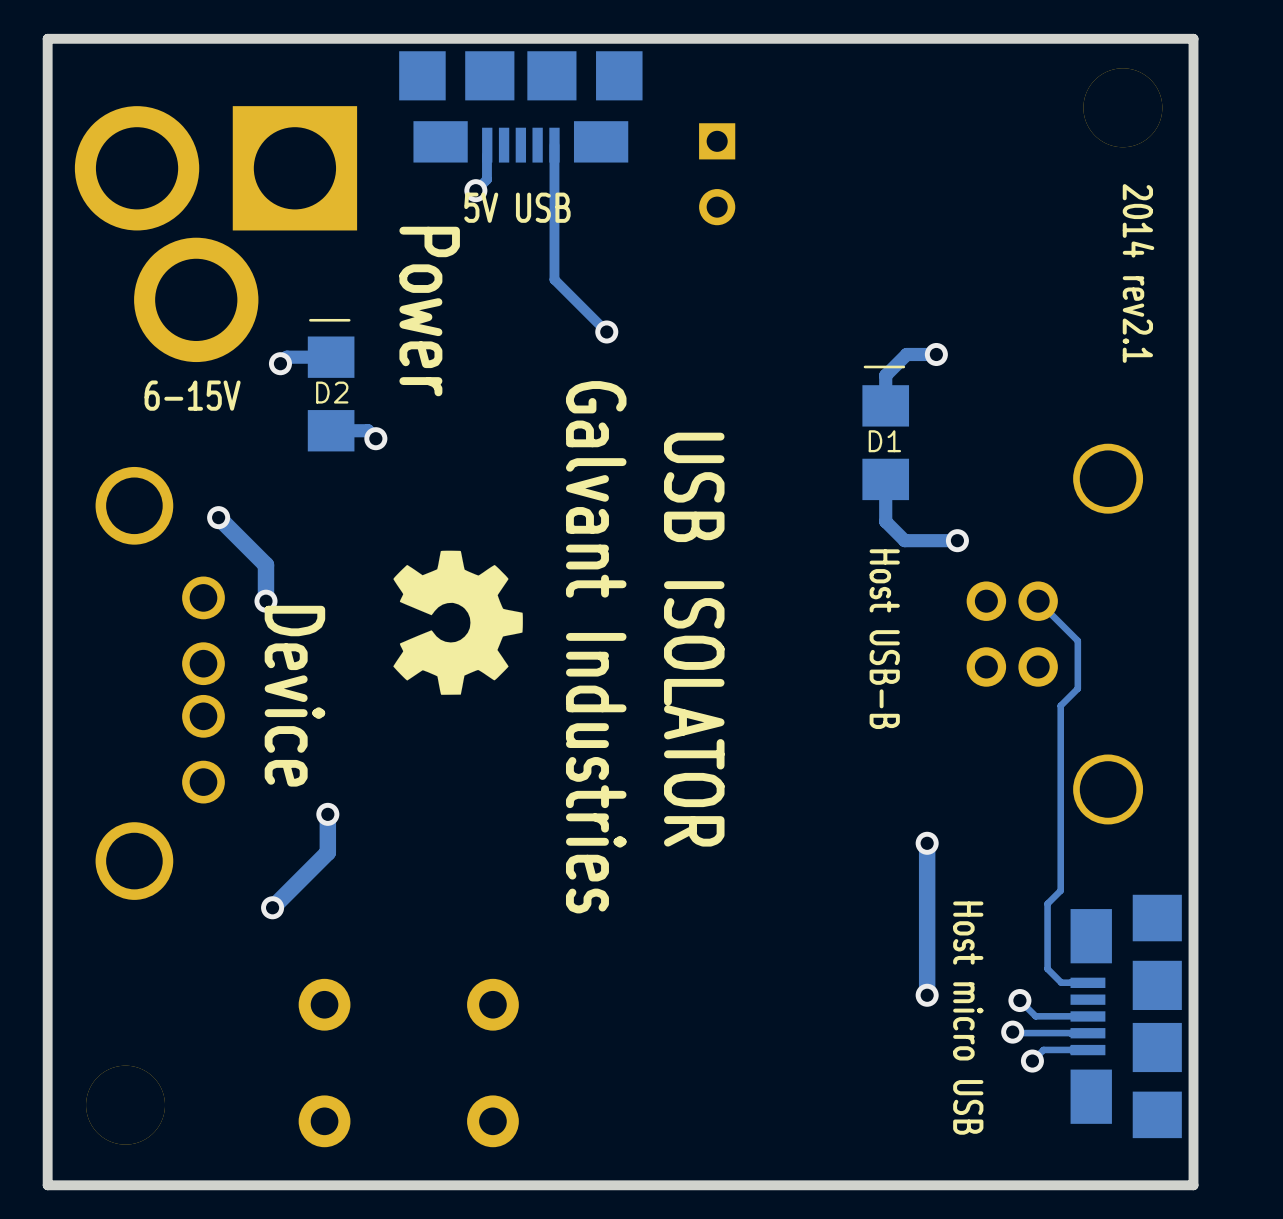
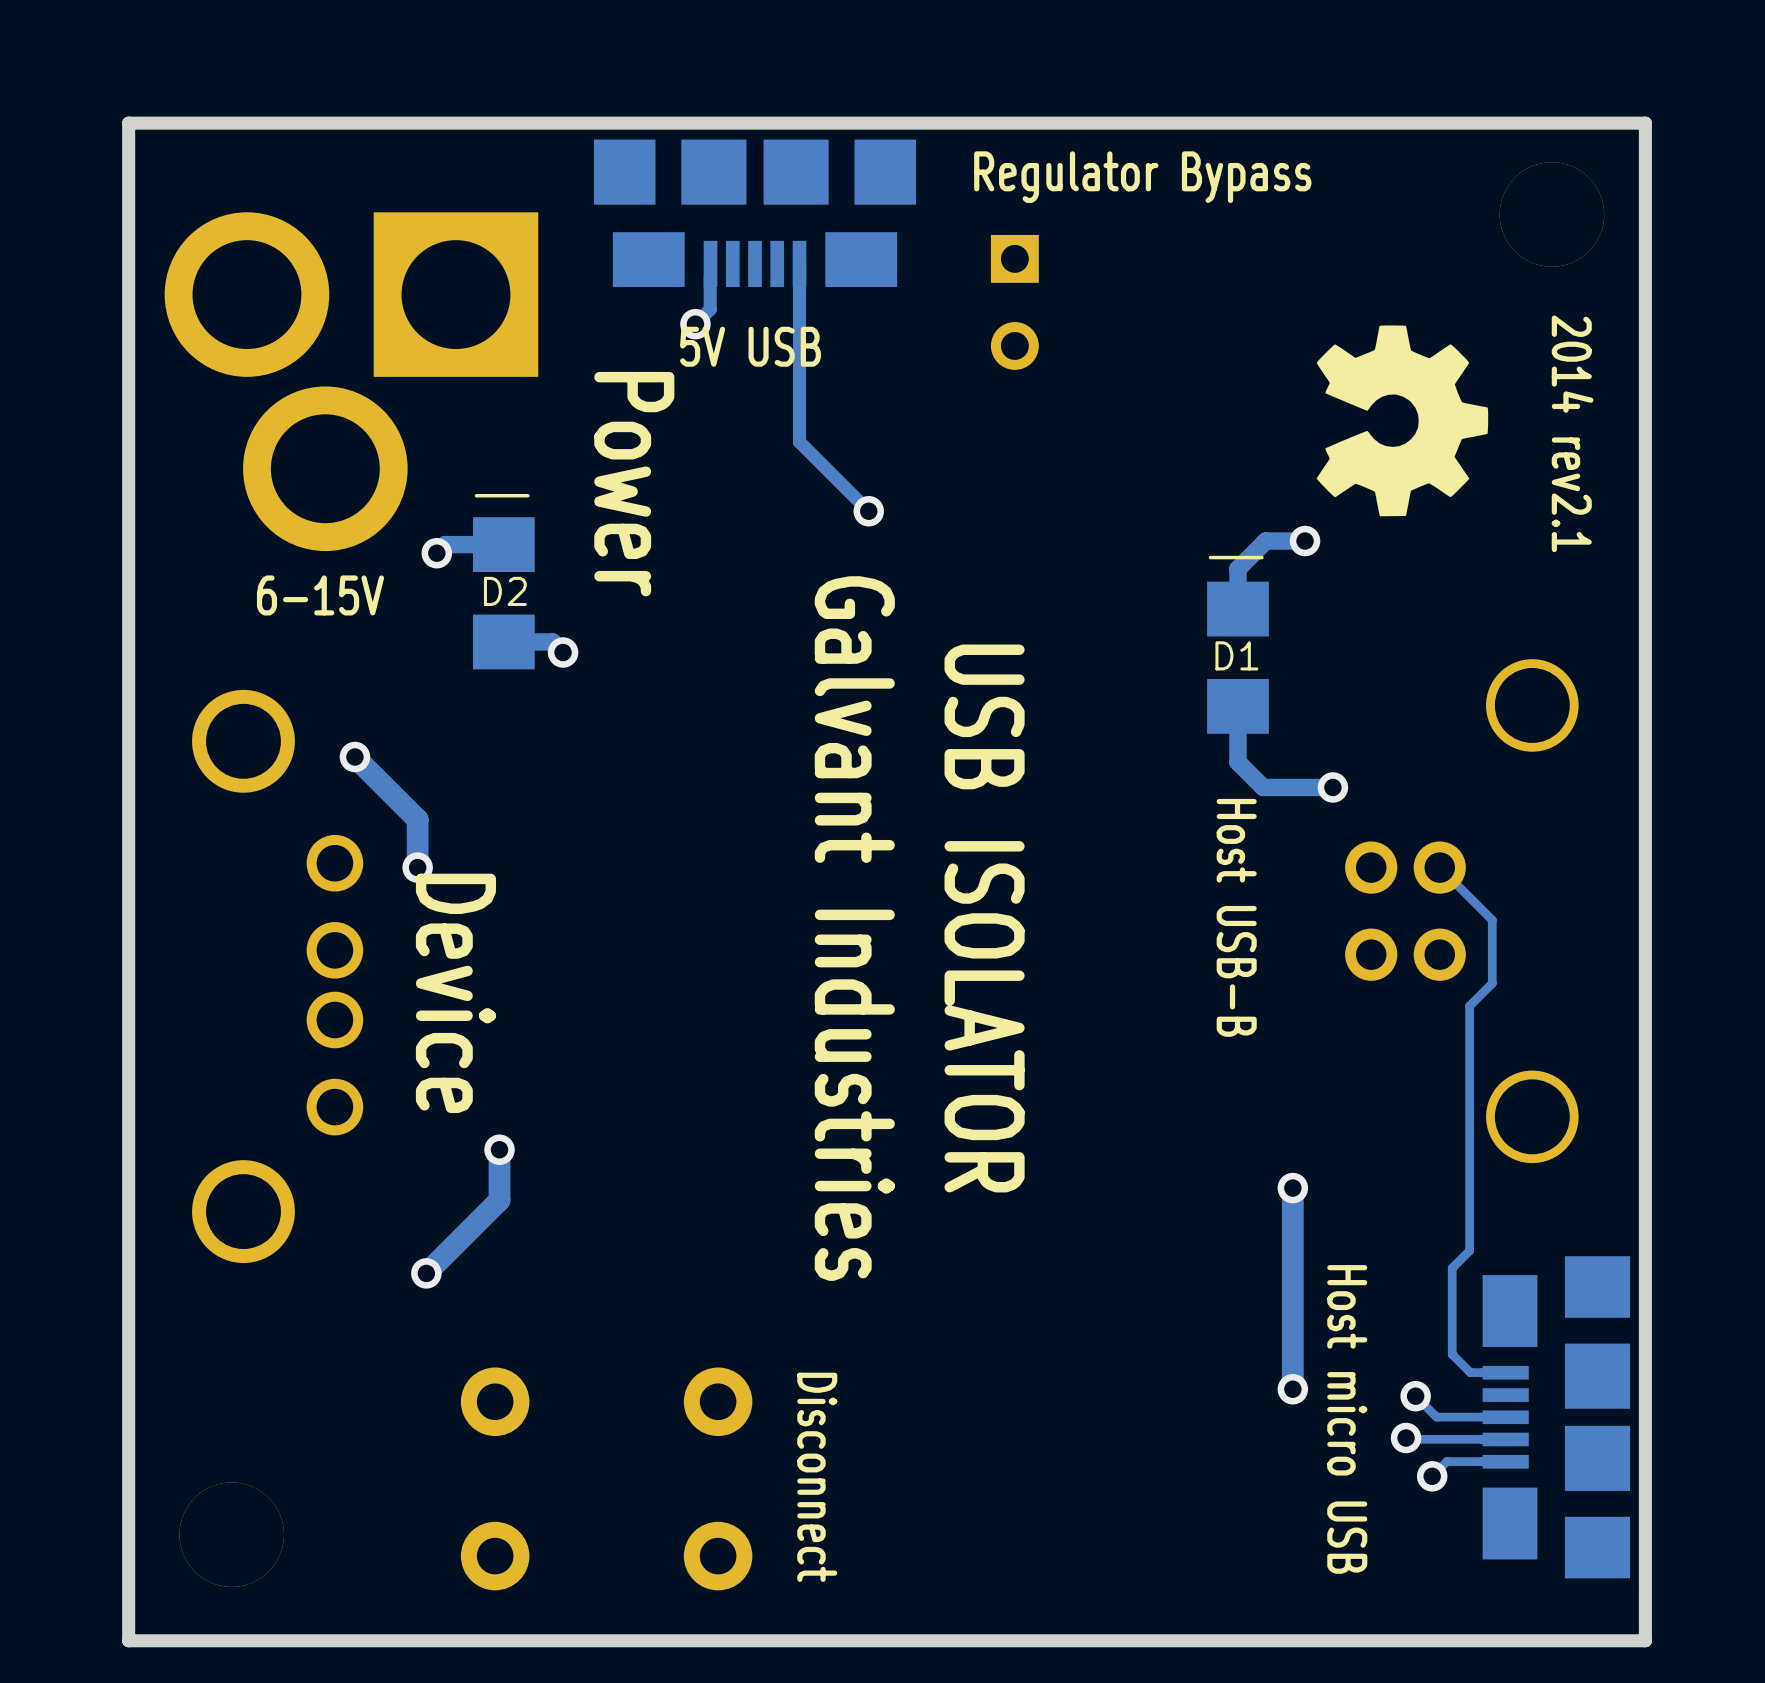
text: none -> Regulator Bypass (1142, 177)
drawing: none -> [1316, 325, 1489, 517]
drawing: [393, 550, 523, 695] -> none
text: none -> Disconnect (817, 1477)

